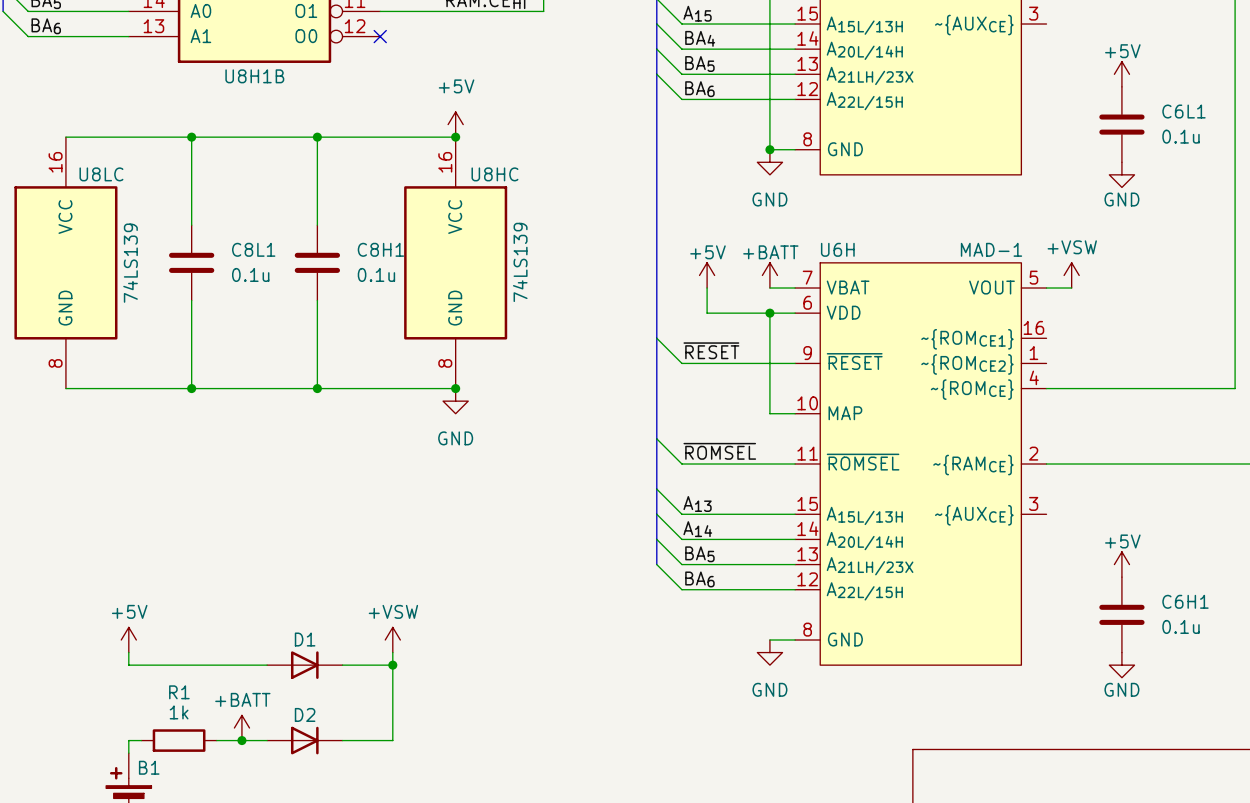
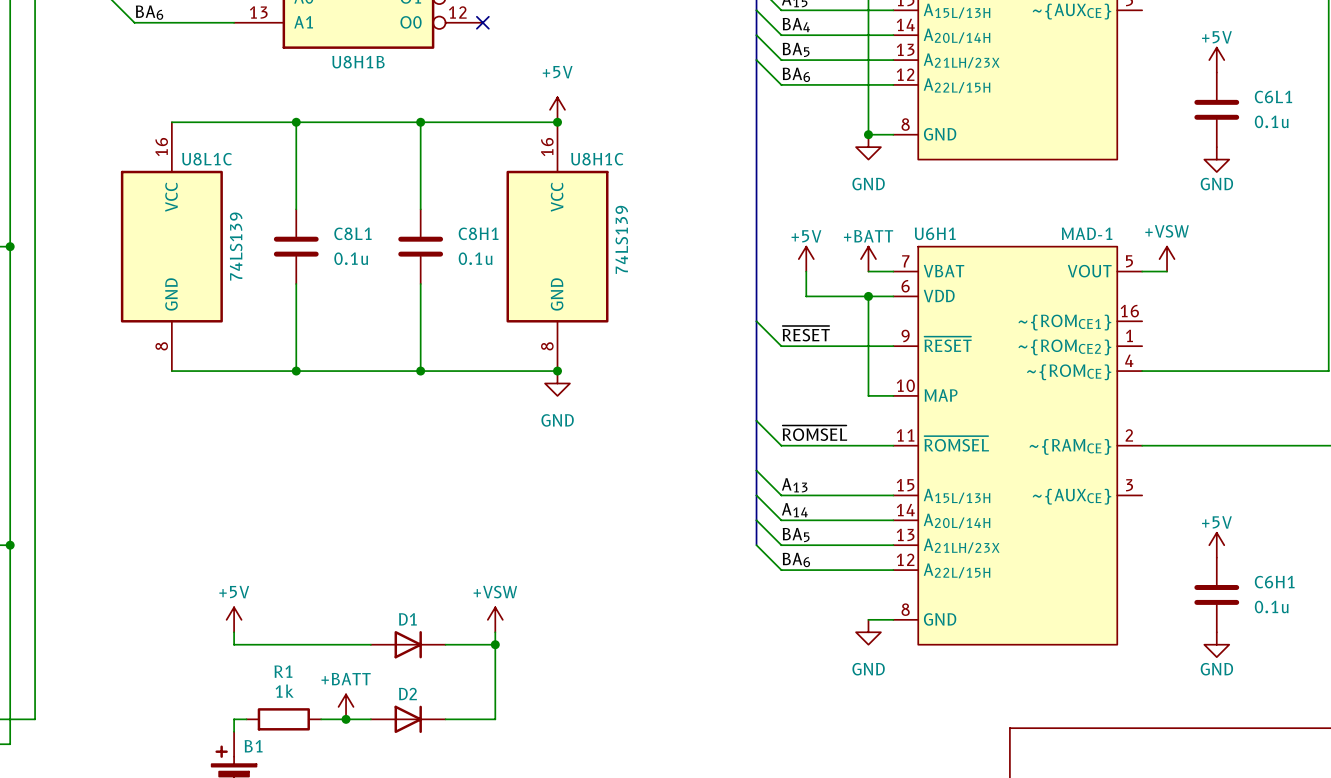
U8LC name: U8LC (101, 174) -> U8L1C (207, 159)
U8HC name: U8HC (494, 174) -> U8H1C (597, 159)
U6H name: U6H (837, 249) -> U6H1 (935, 233)

